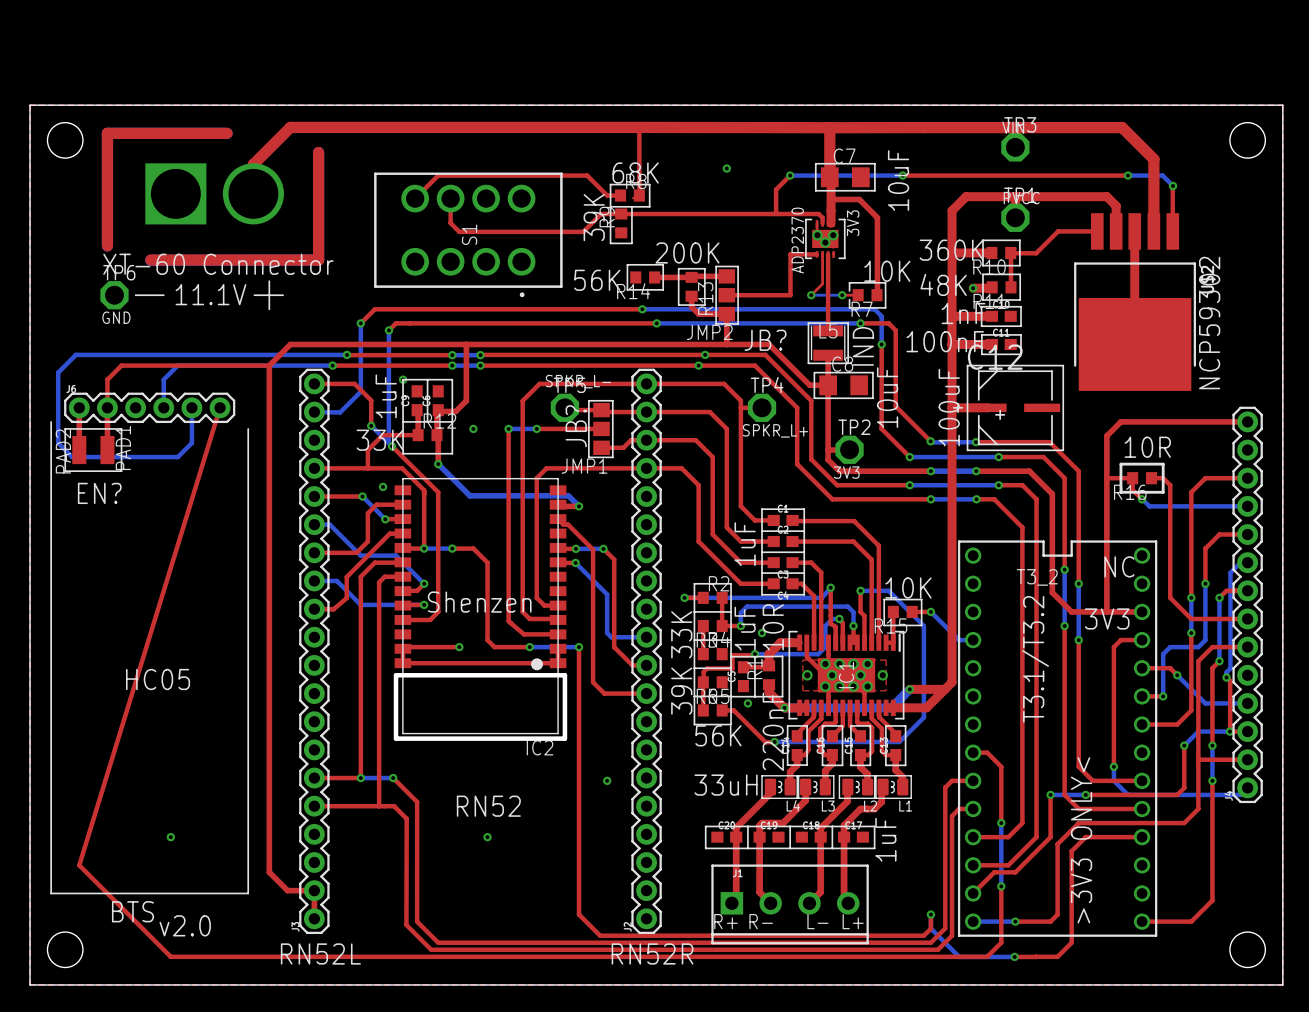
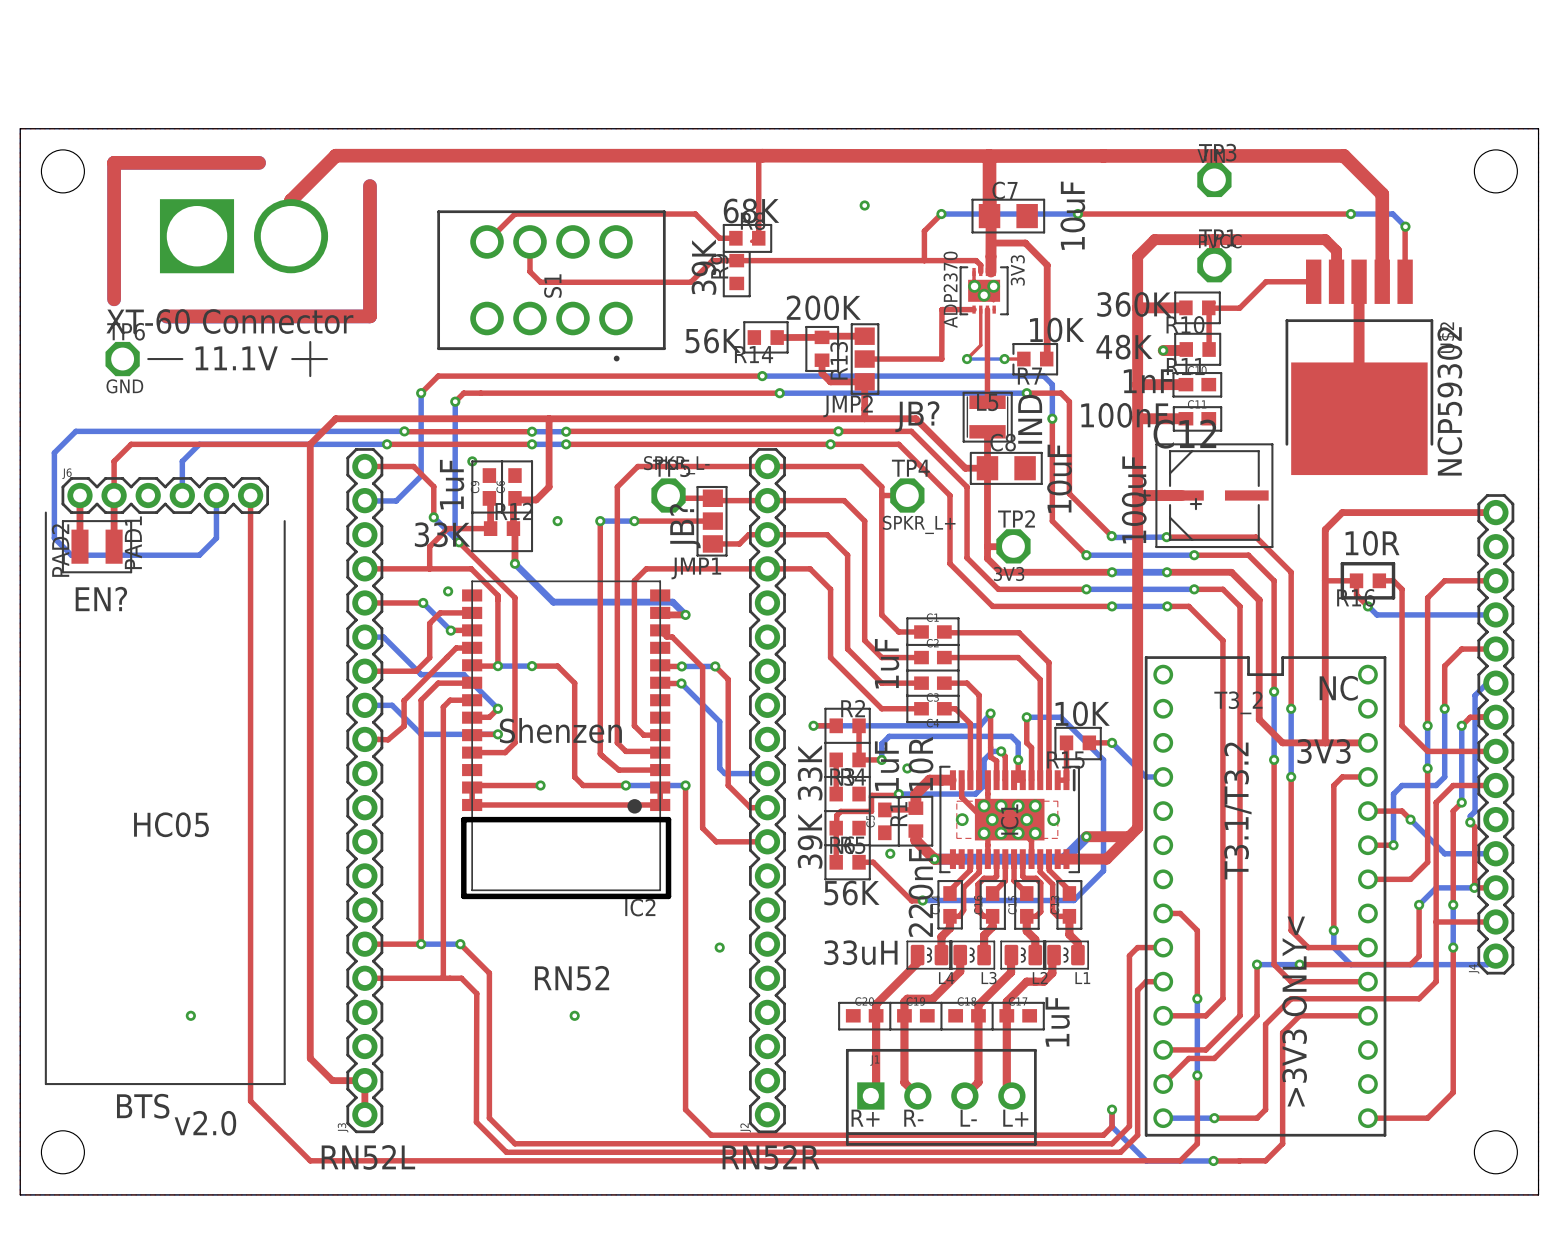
top track: (220, 407) (79, 865) (170, 956) (269, 956) -> (250, 495) (250, 1101) (310, 1160)

